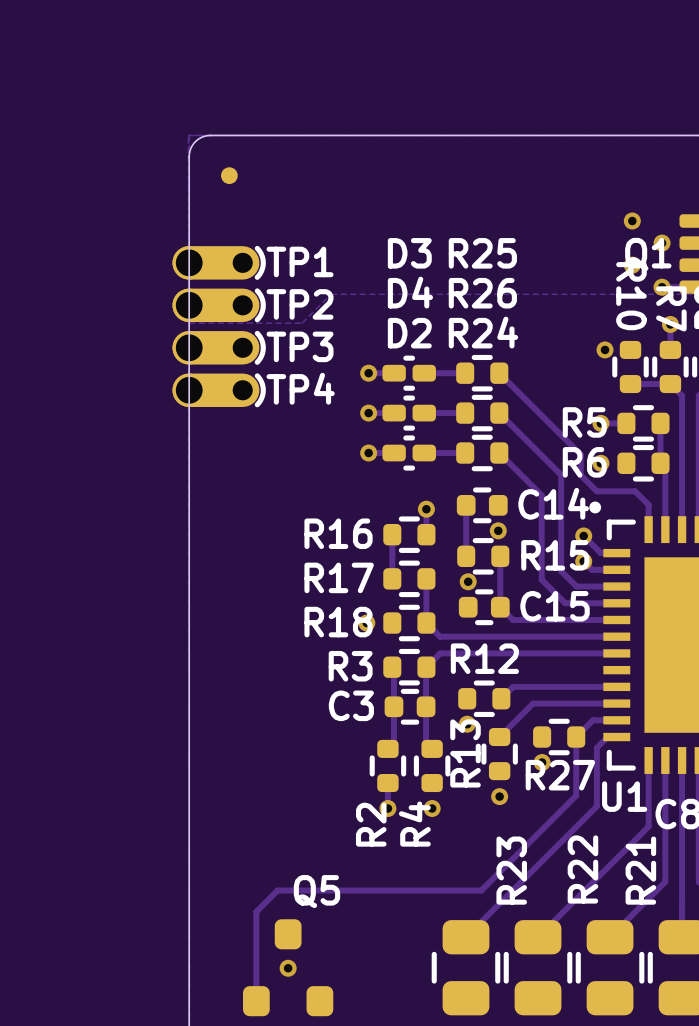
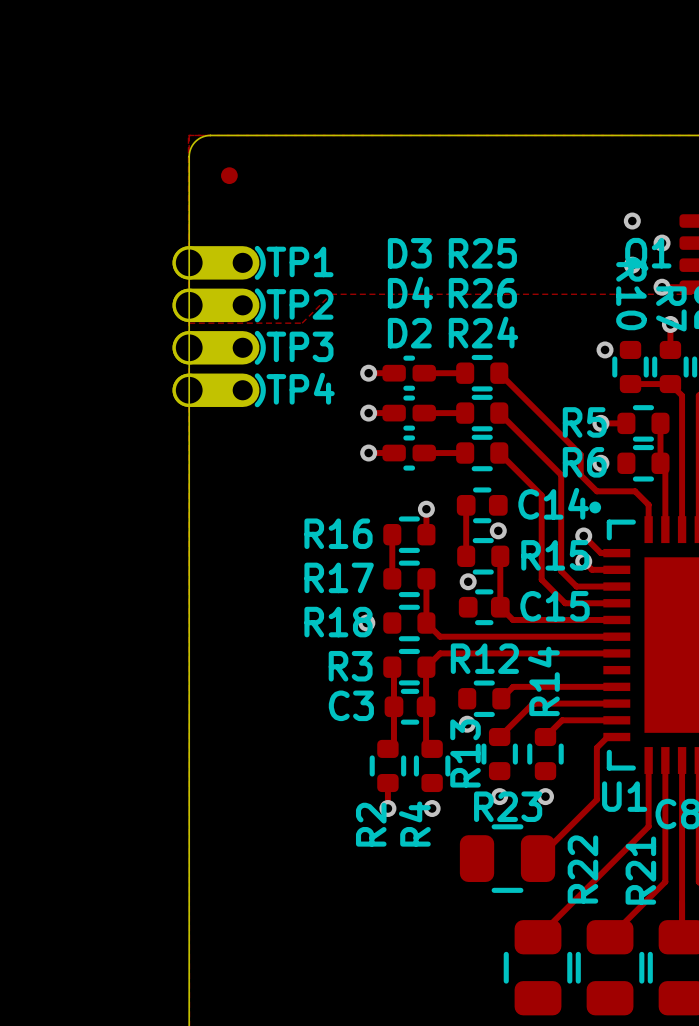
track: (592, 720) (576, 737) (576, 795) (481, 890) (277, 890) (256, 911) (256, 1001) -> (592, 720) (562, 720) (545, 737)
R27: (559, 737) -> none
R14: none -> (545, 754)
via position: (542, 762) -> (545, 796)
track: (596, 799) (596, 806) (465, 937) -> (596, 799) (538, 858)
R23 name position: R23 (511, 870) -> R23 (508, 806)
Q5: (288, 967) -> none
R23 rotation: 0° (465, 967) -> 90° clockwise (507, 858)
R23 position: (465, 967) -> (507, 858)
via: (288, 968) -> none

